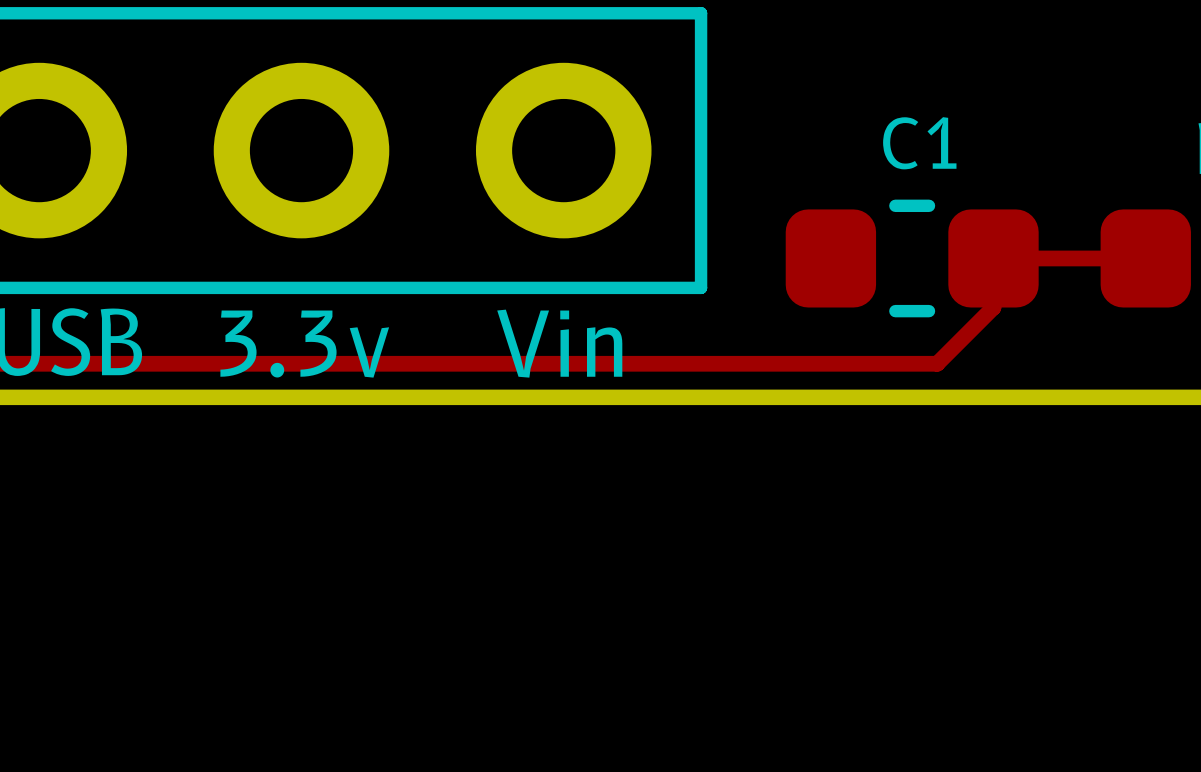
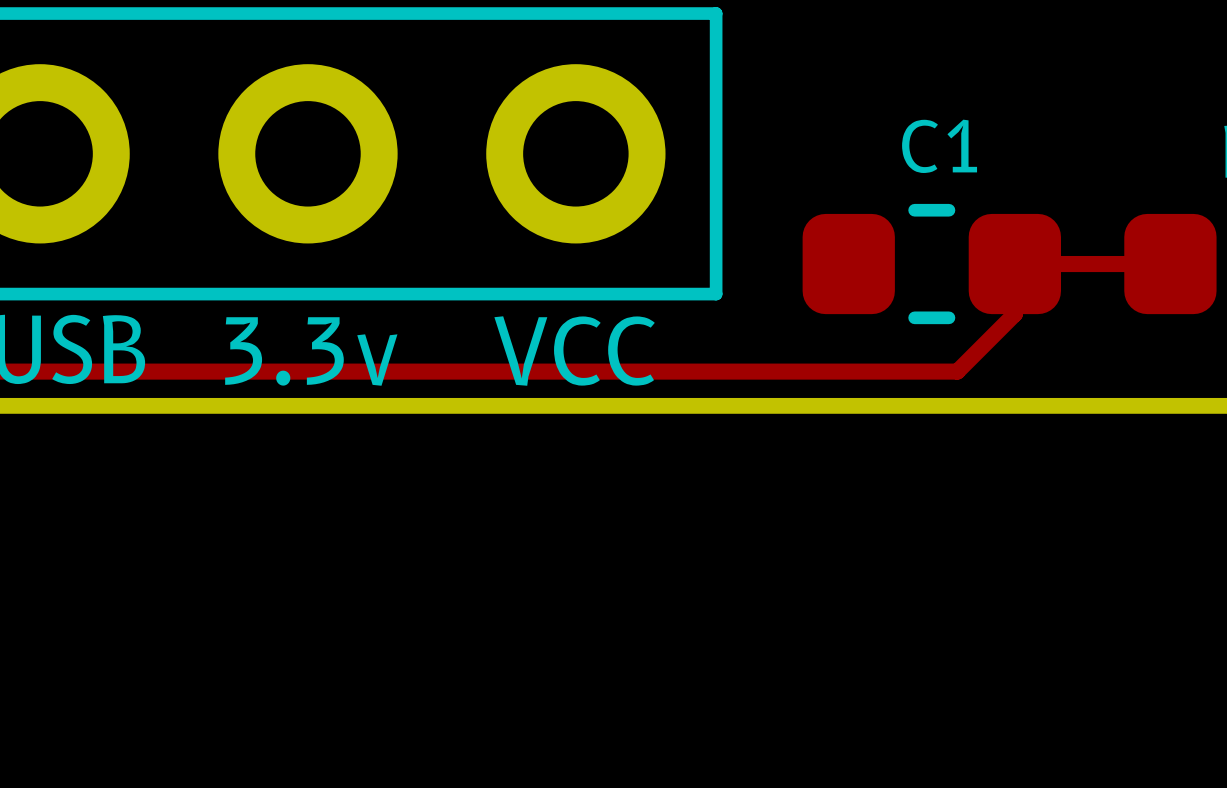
text: Vin (559, 343) -> VCC (574, 351)

